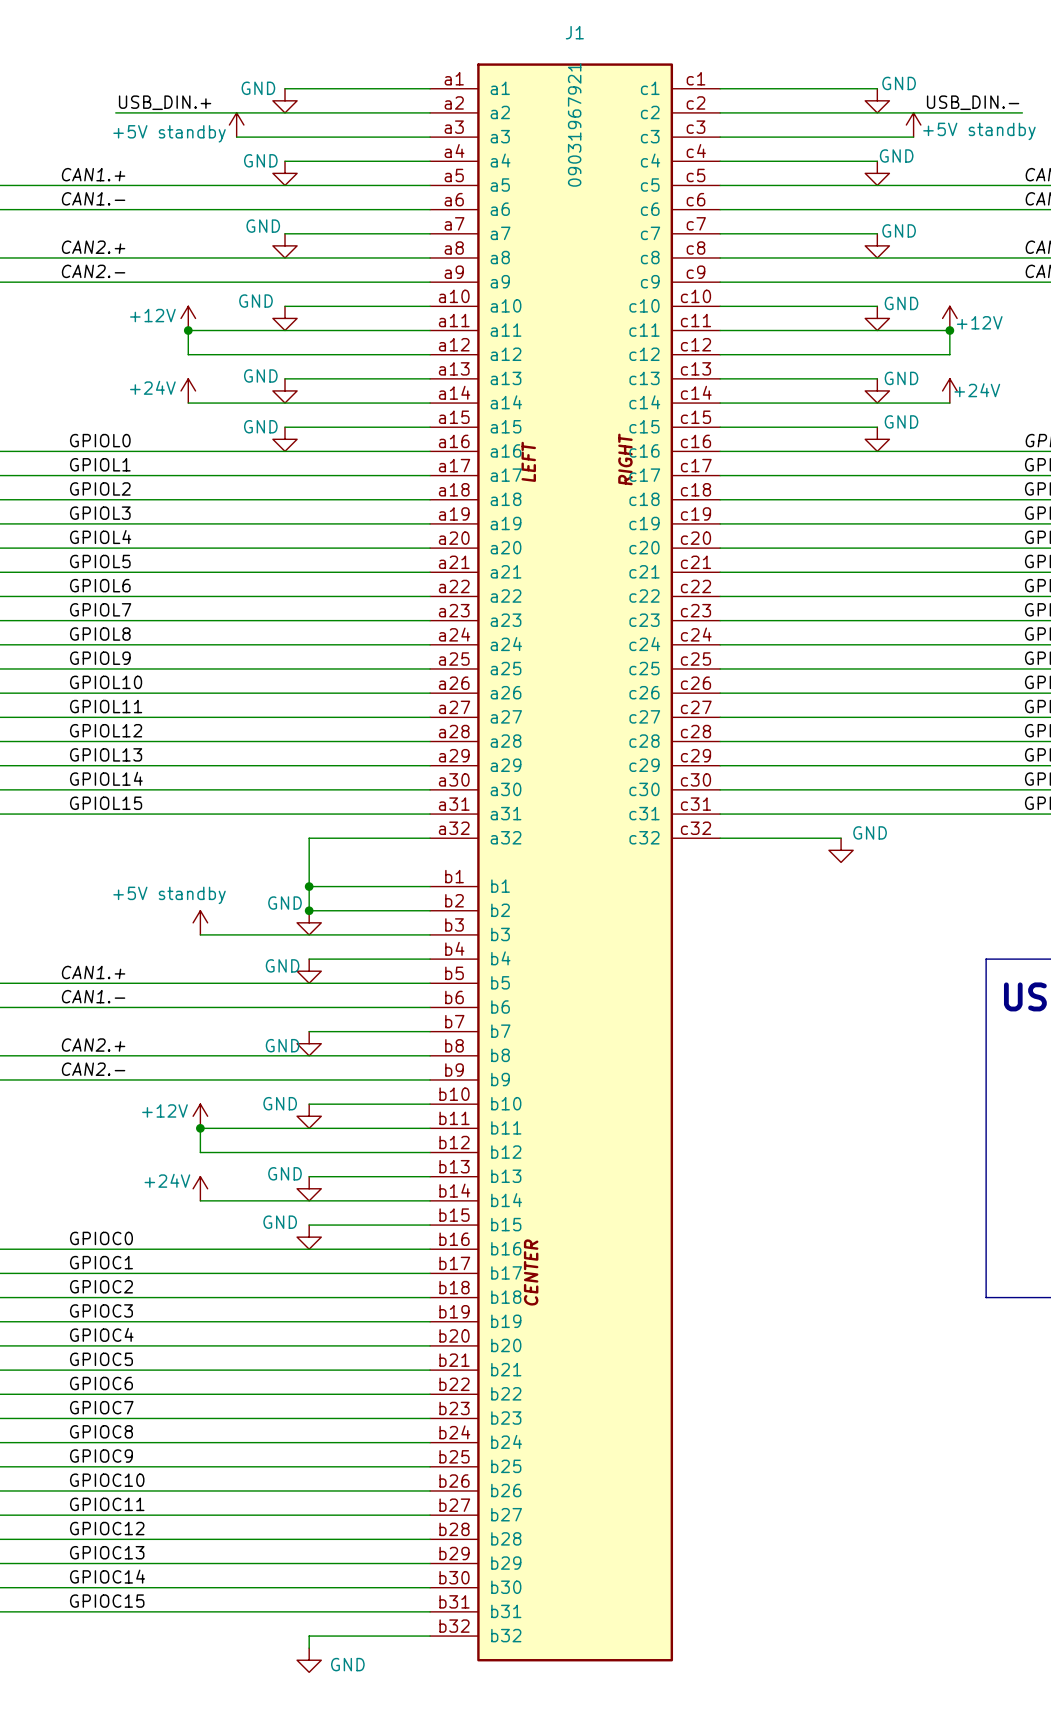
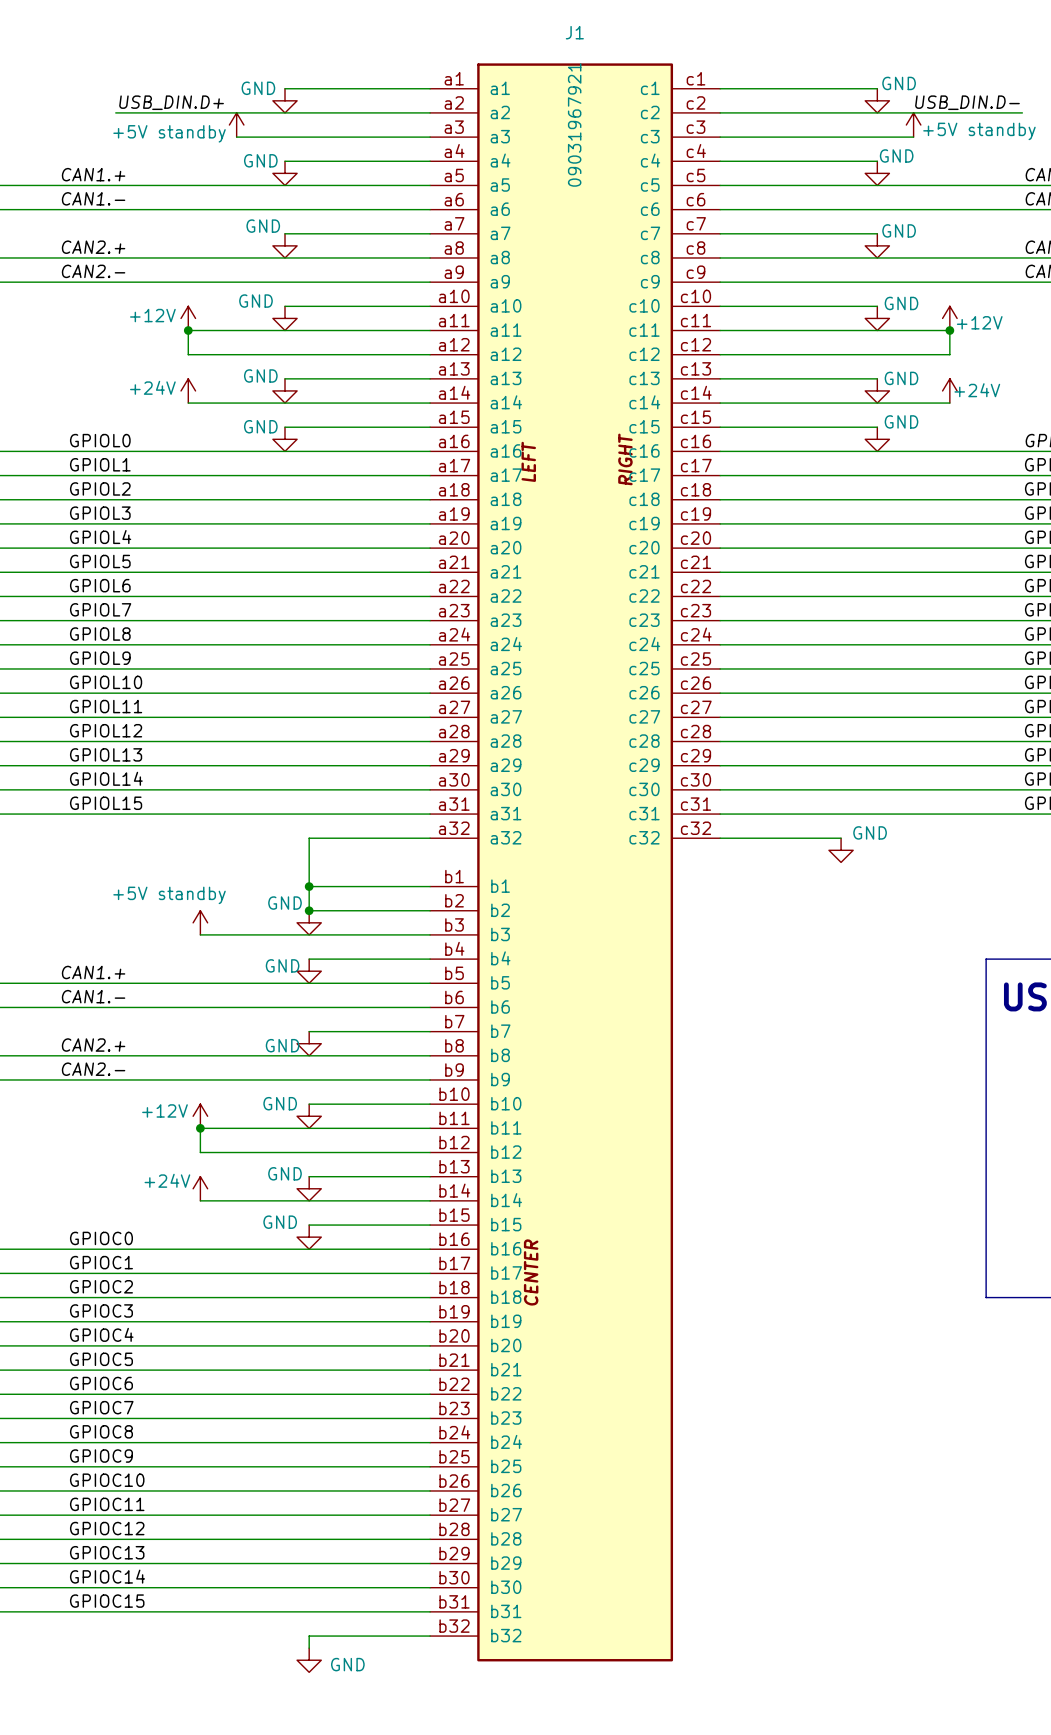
label: USB_DIN.+ (165, 102) -> USB_DIN.D+ (171, 102)
label: USB_DIN.- (973, 102) -> USB_DIN.D- (967, 102)

